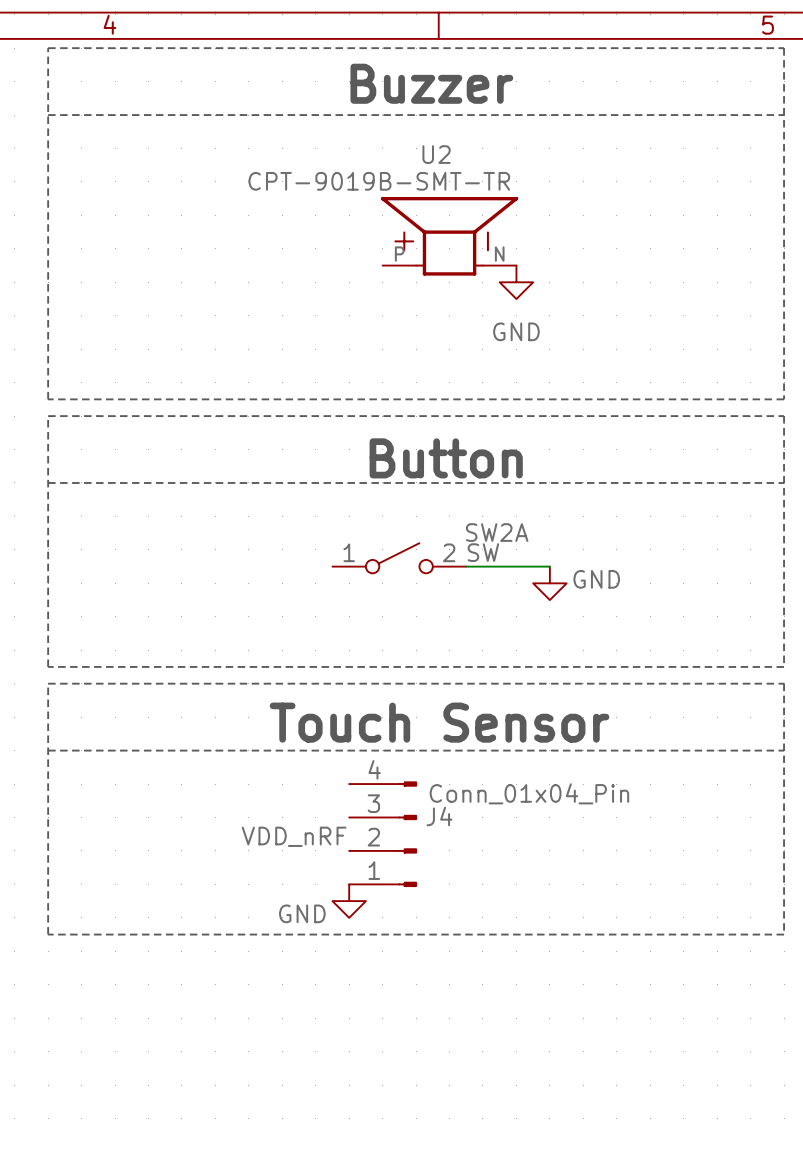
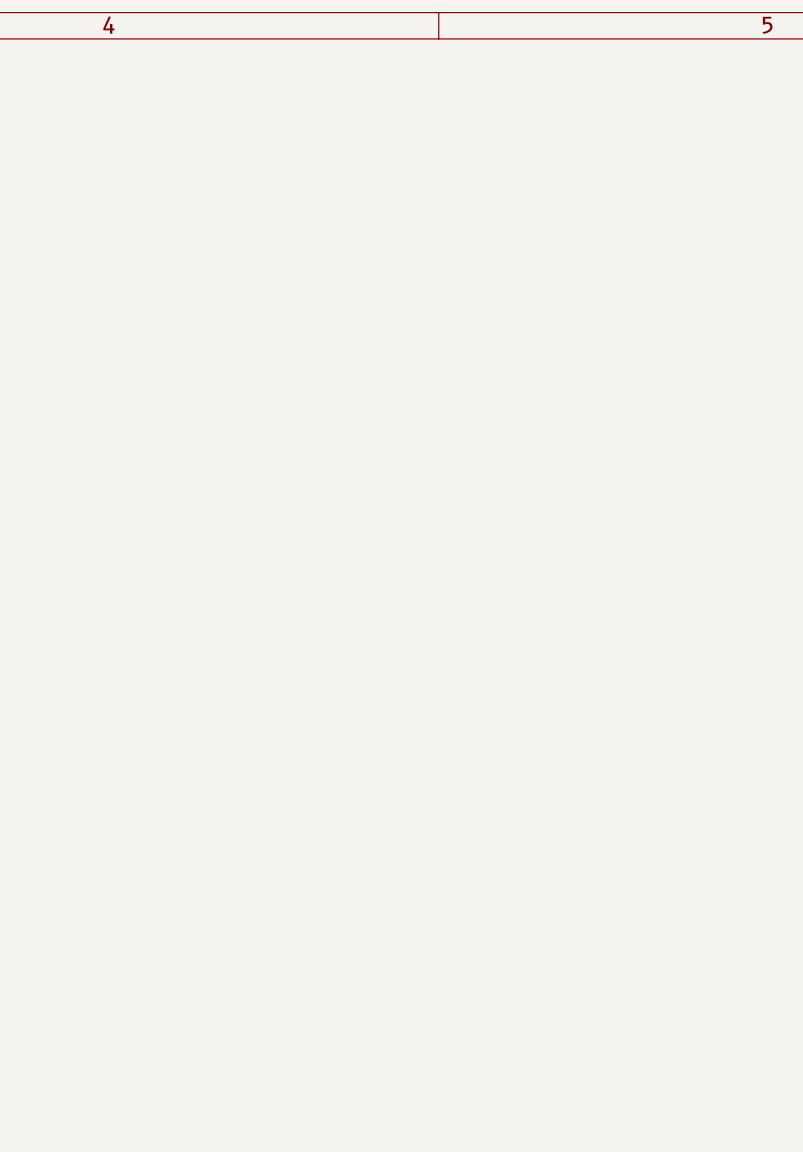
line: (48, 48) (48, 399) (784, 399) (784, 48) (48, 48) -> none
text: Buzzer (431, 83) -> none
line: (48, 115) (784, 115) -> none
U2: CPT-9019B-SMT-TR (449, 236) -> none
power symbol: GND (516, 282) -> none
line: (48, 416) (784, 416) (784, 666) (48, 666) (48, 416) -> none
text: Button (446, 458) -> none
line: (48, 482) (784, 482) -> none
SW2A: SW (399, 558) -> none
wire: (466, 566) (549, 566) -> none
power symbol: GND (549, 583) -> none
line: (48, 683) (48, 934) (784, 934) (784, 683) (48, 683) -> none
text: Touch Sensor (439, 722) -> none
line: (48, 750) (784, 750) -> none
J4: Conn_01x04_Pin (383, 834) -> none
label: VDD_nRF (294, 836) -> none
power symbol: GND (349, 901) -> none

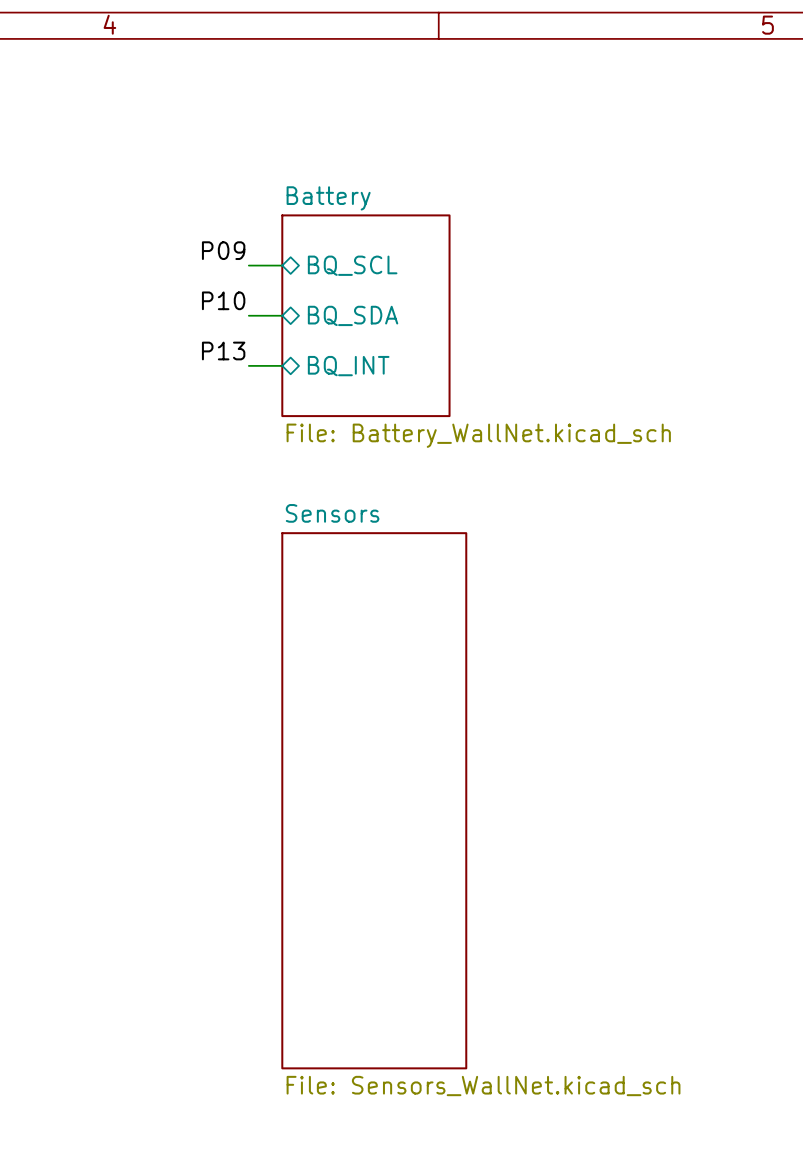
label: none -> P09 (223, 250)
wire: none -> (248, 265) (282, 265)
sheet pin: none -> BQ_SCL (352, 265)
label: none -> P10 (223, 300)
wire: none -> (248, 315) (282, 315)
sheet Battery: none -> File: Battery_WallNet.kicad_sch (365, 315)
sheet pin: none -> BQ_SDA (353, 315)
label: none -> P13 (223, 350)
wire: none -> (248, 365) (282, 365)
sheet pin: none -> BQ_INT (348, 366)
sheet Sensors: none -> File: Sensors_WallNet.kicad_sch (374, 800)

